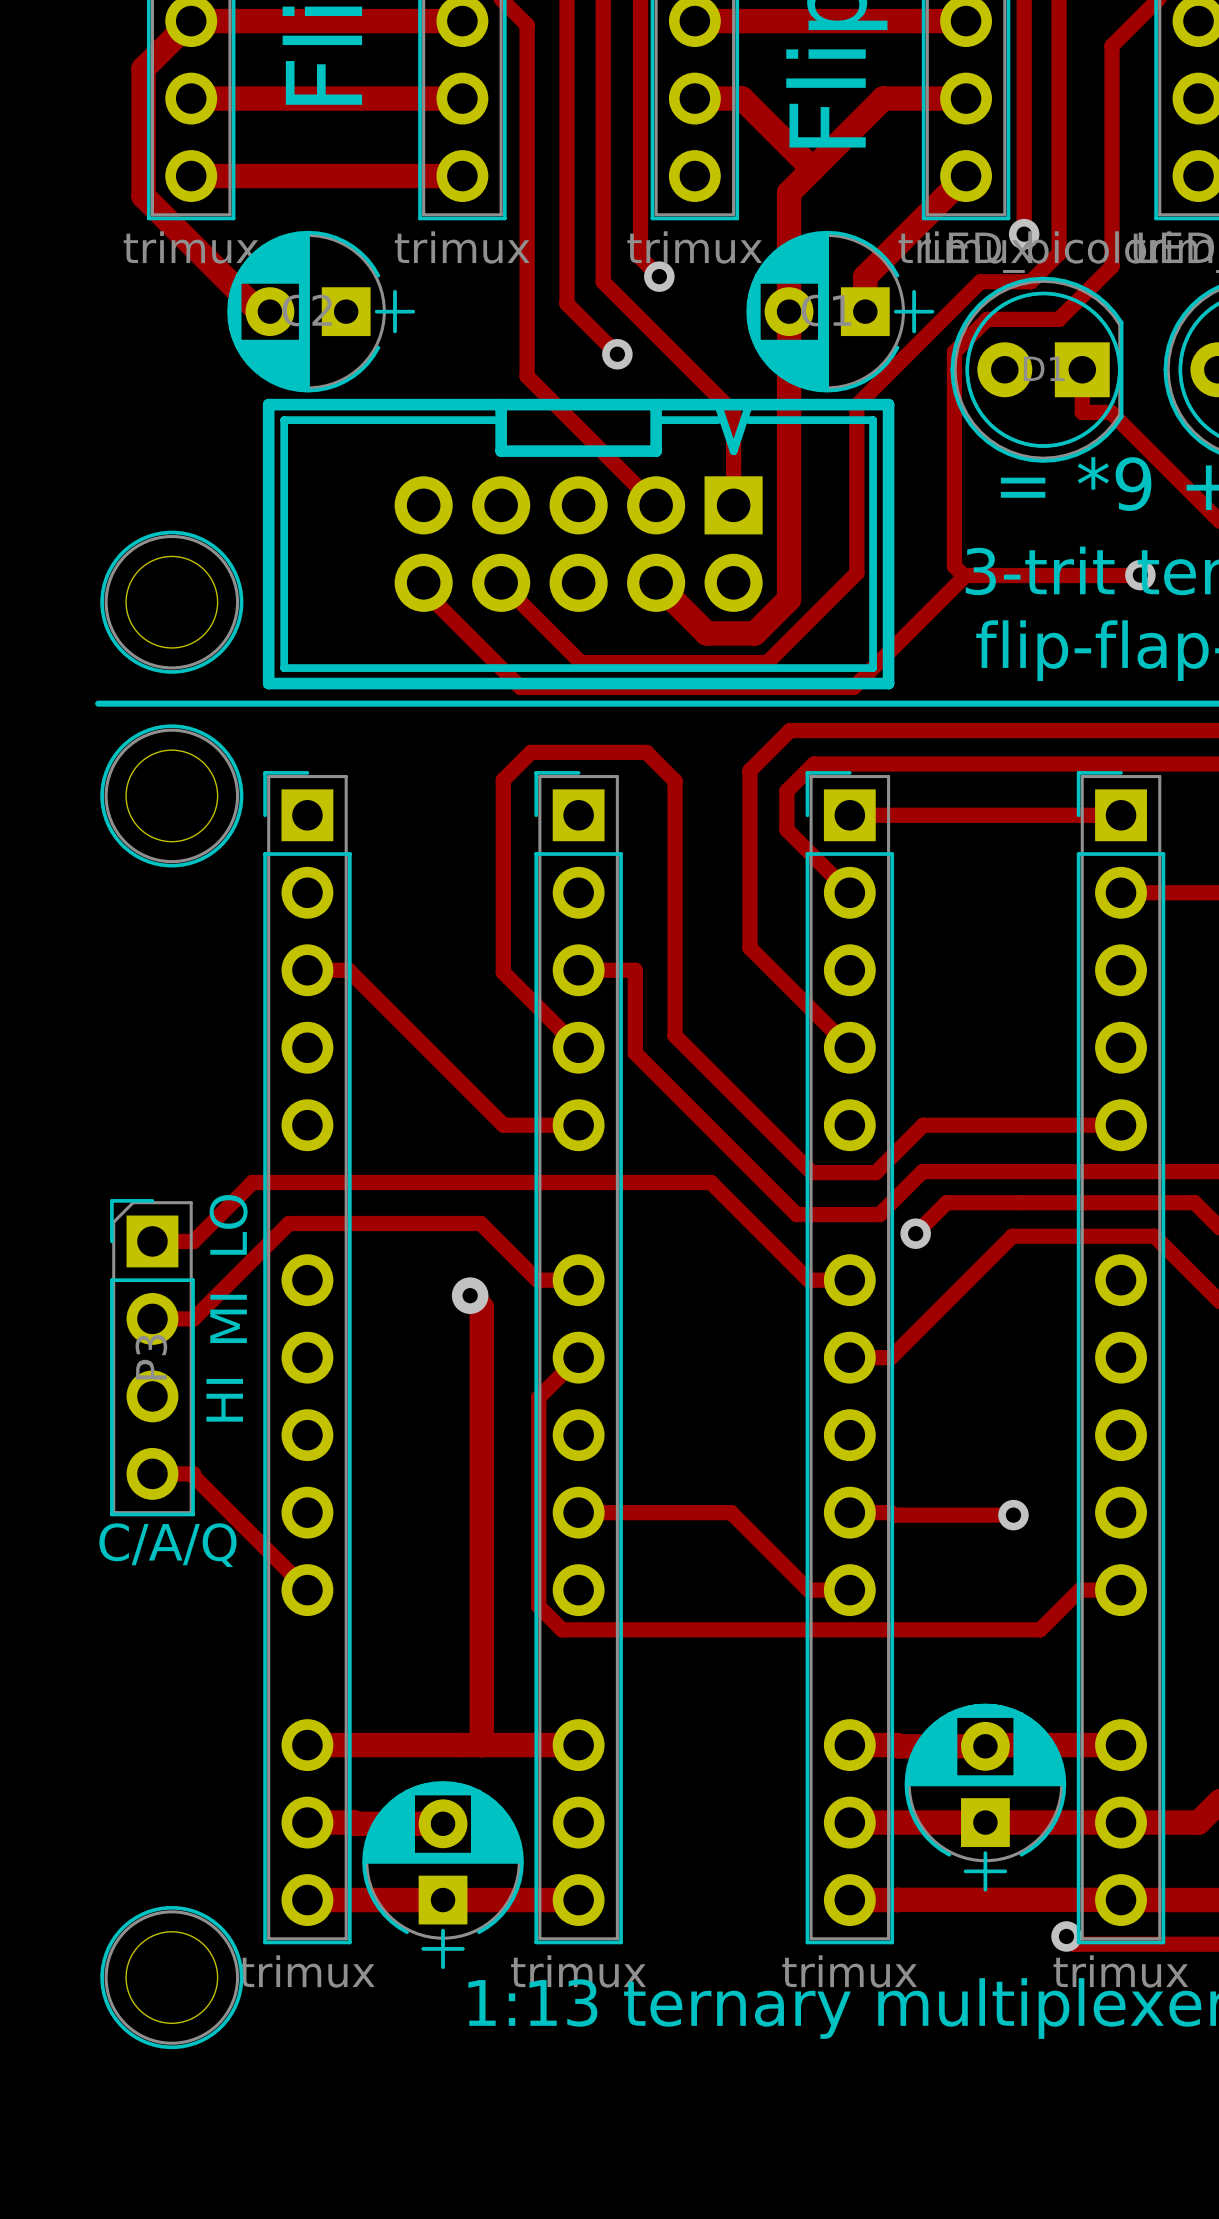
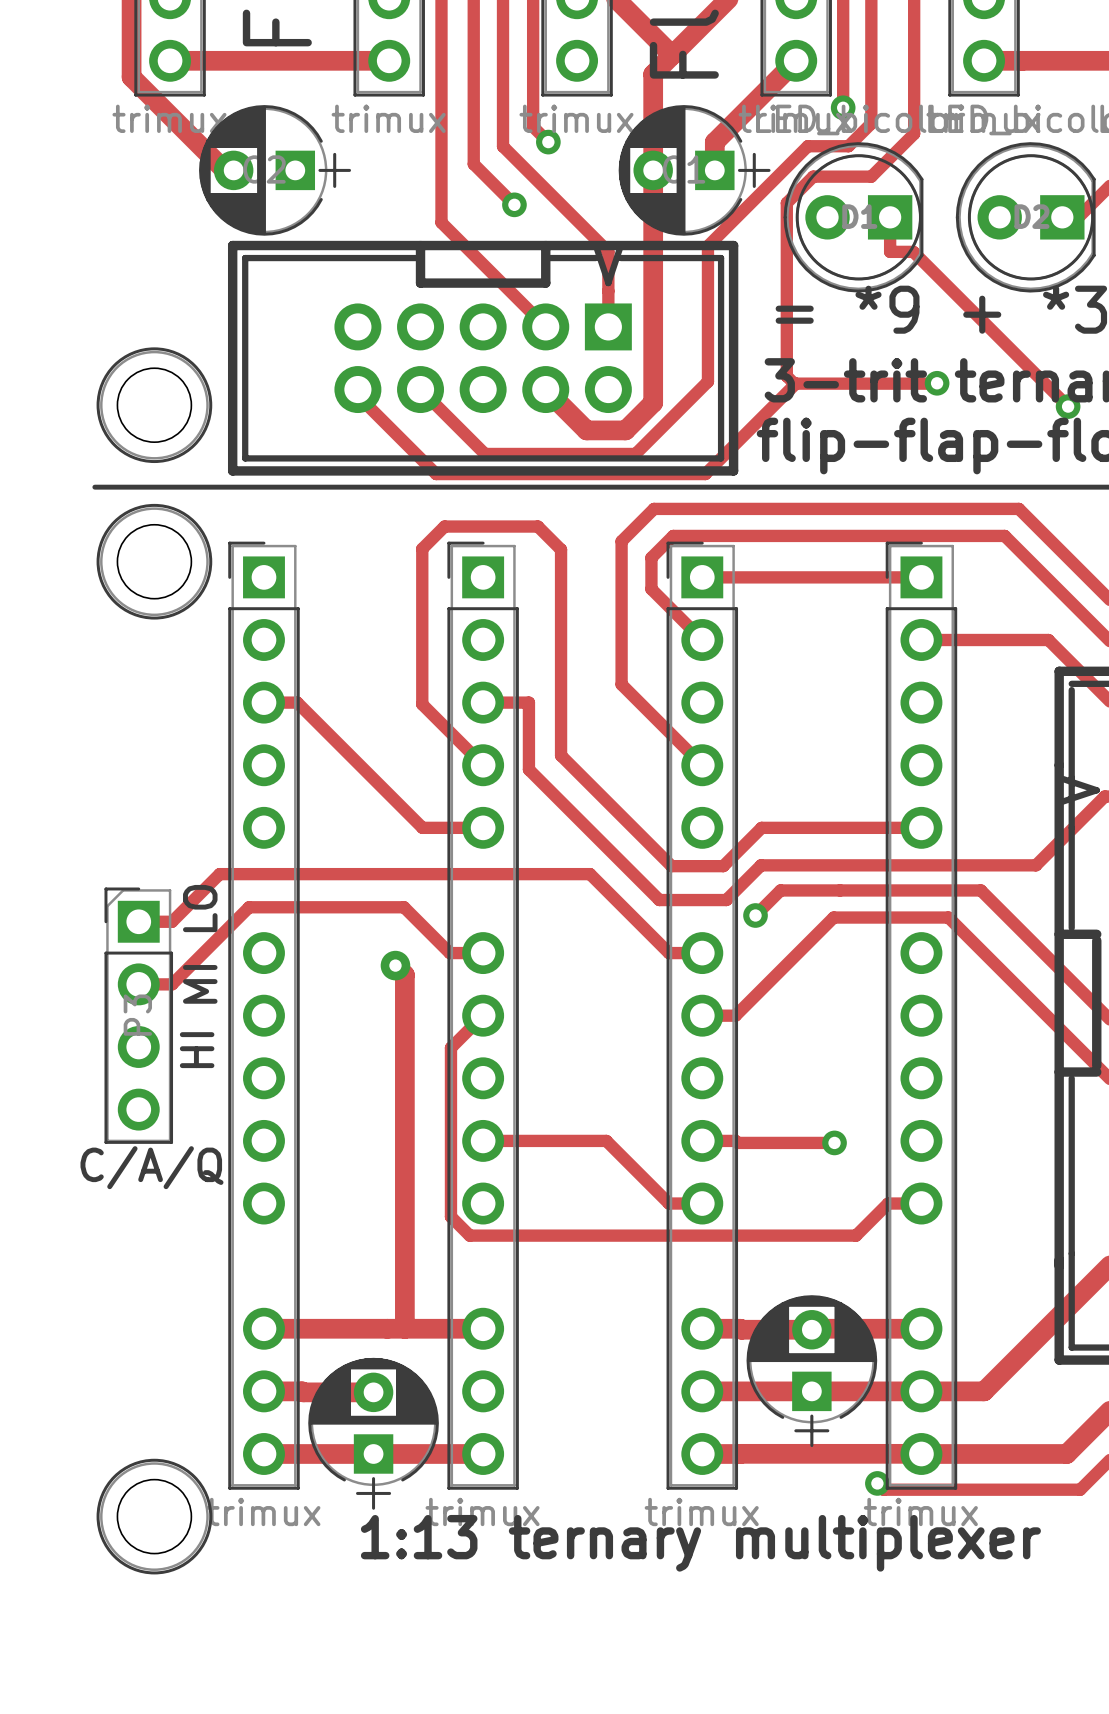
track: (152, 1473) (193, 1473) (193, 1476) (307, 1590) -> none

